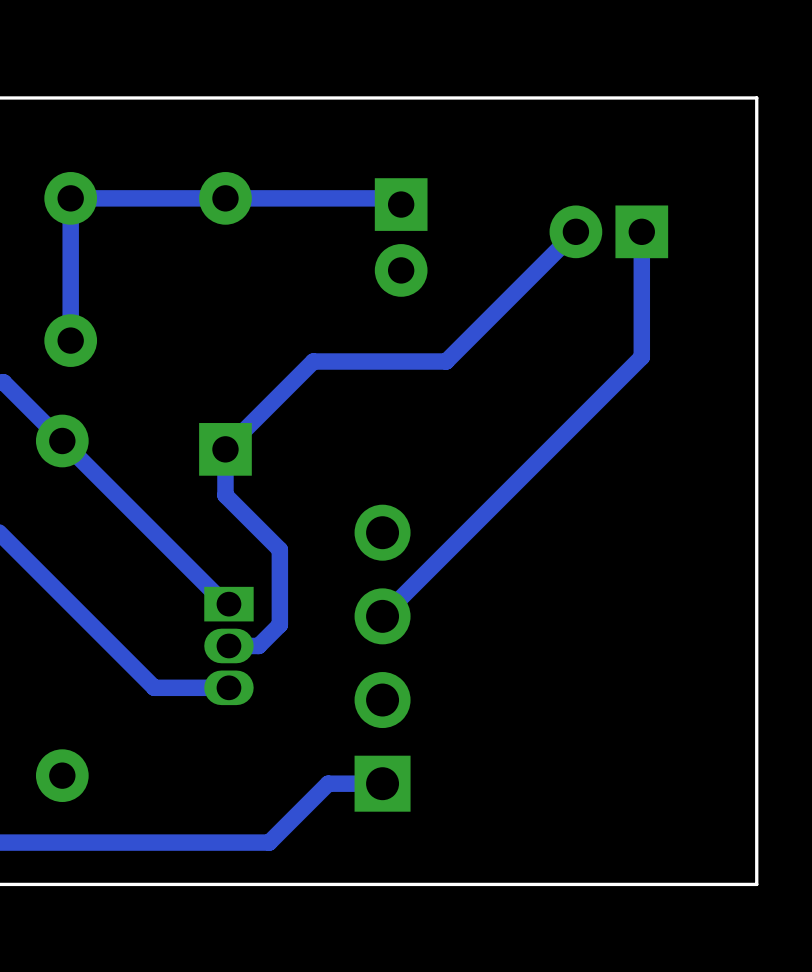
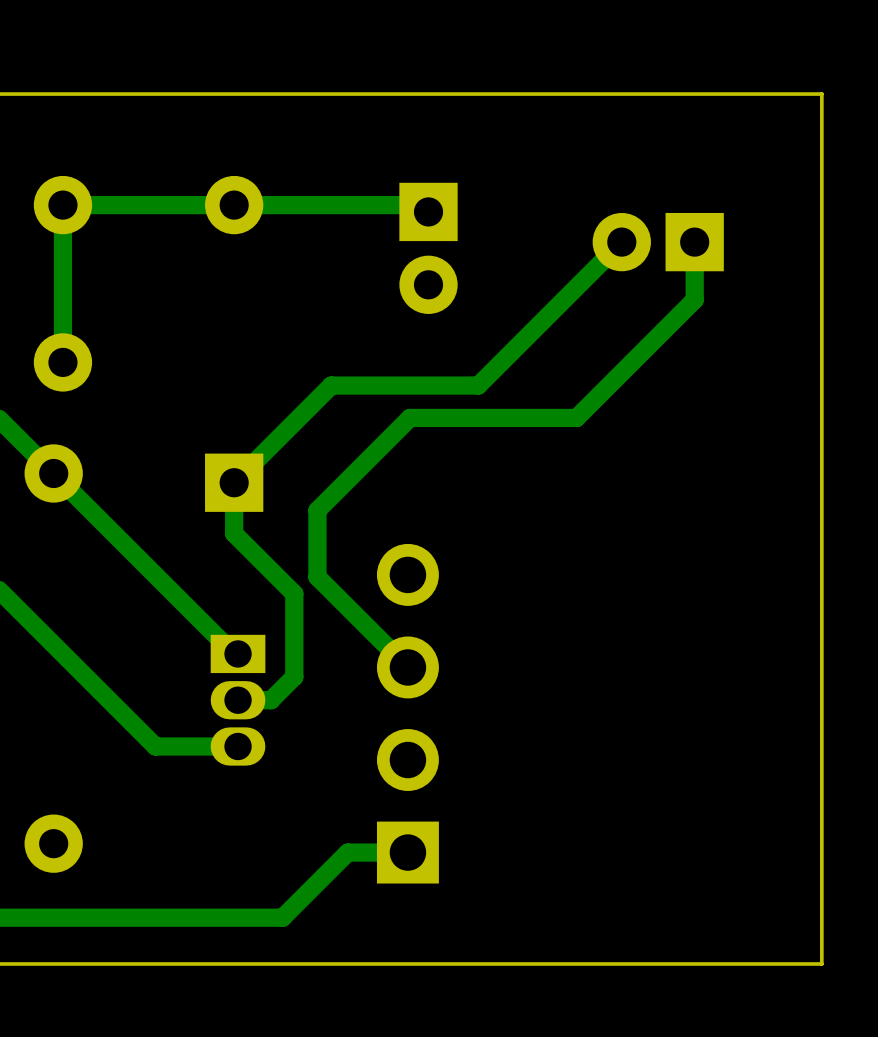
track: (641, 284) (641, 357) (382, 616) -> (694, 299) (576, 417) (410, 417) (317, 510) (317, 576) (407, 667)

